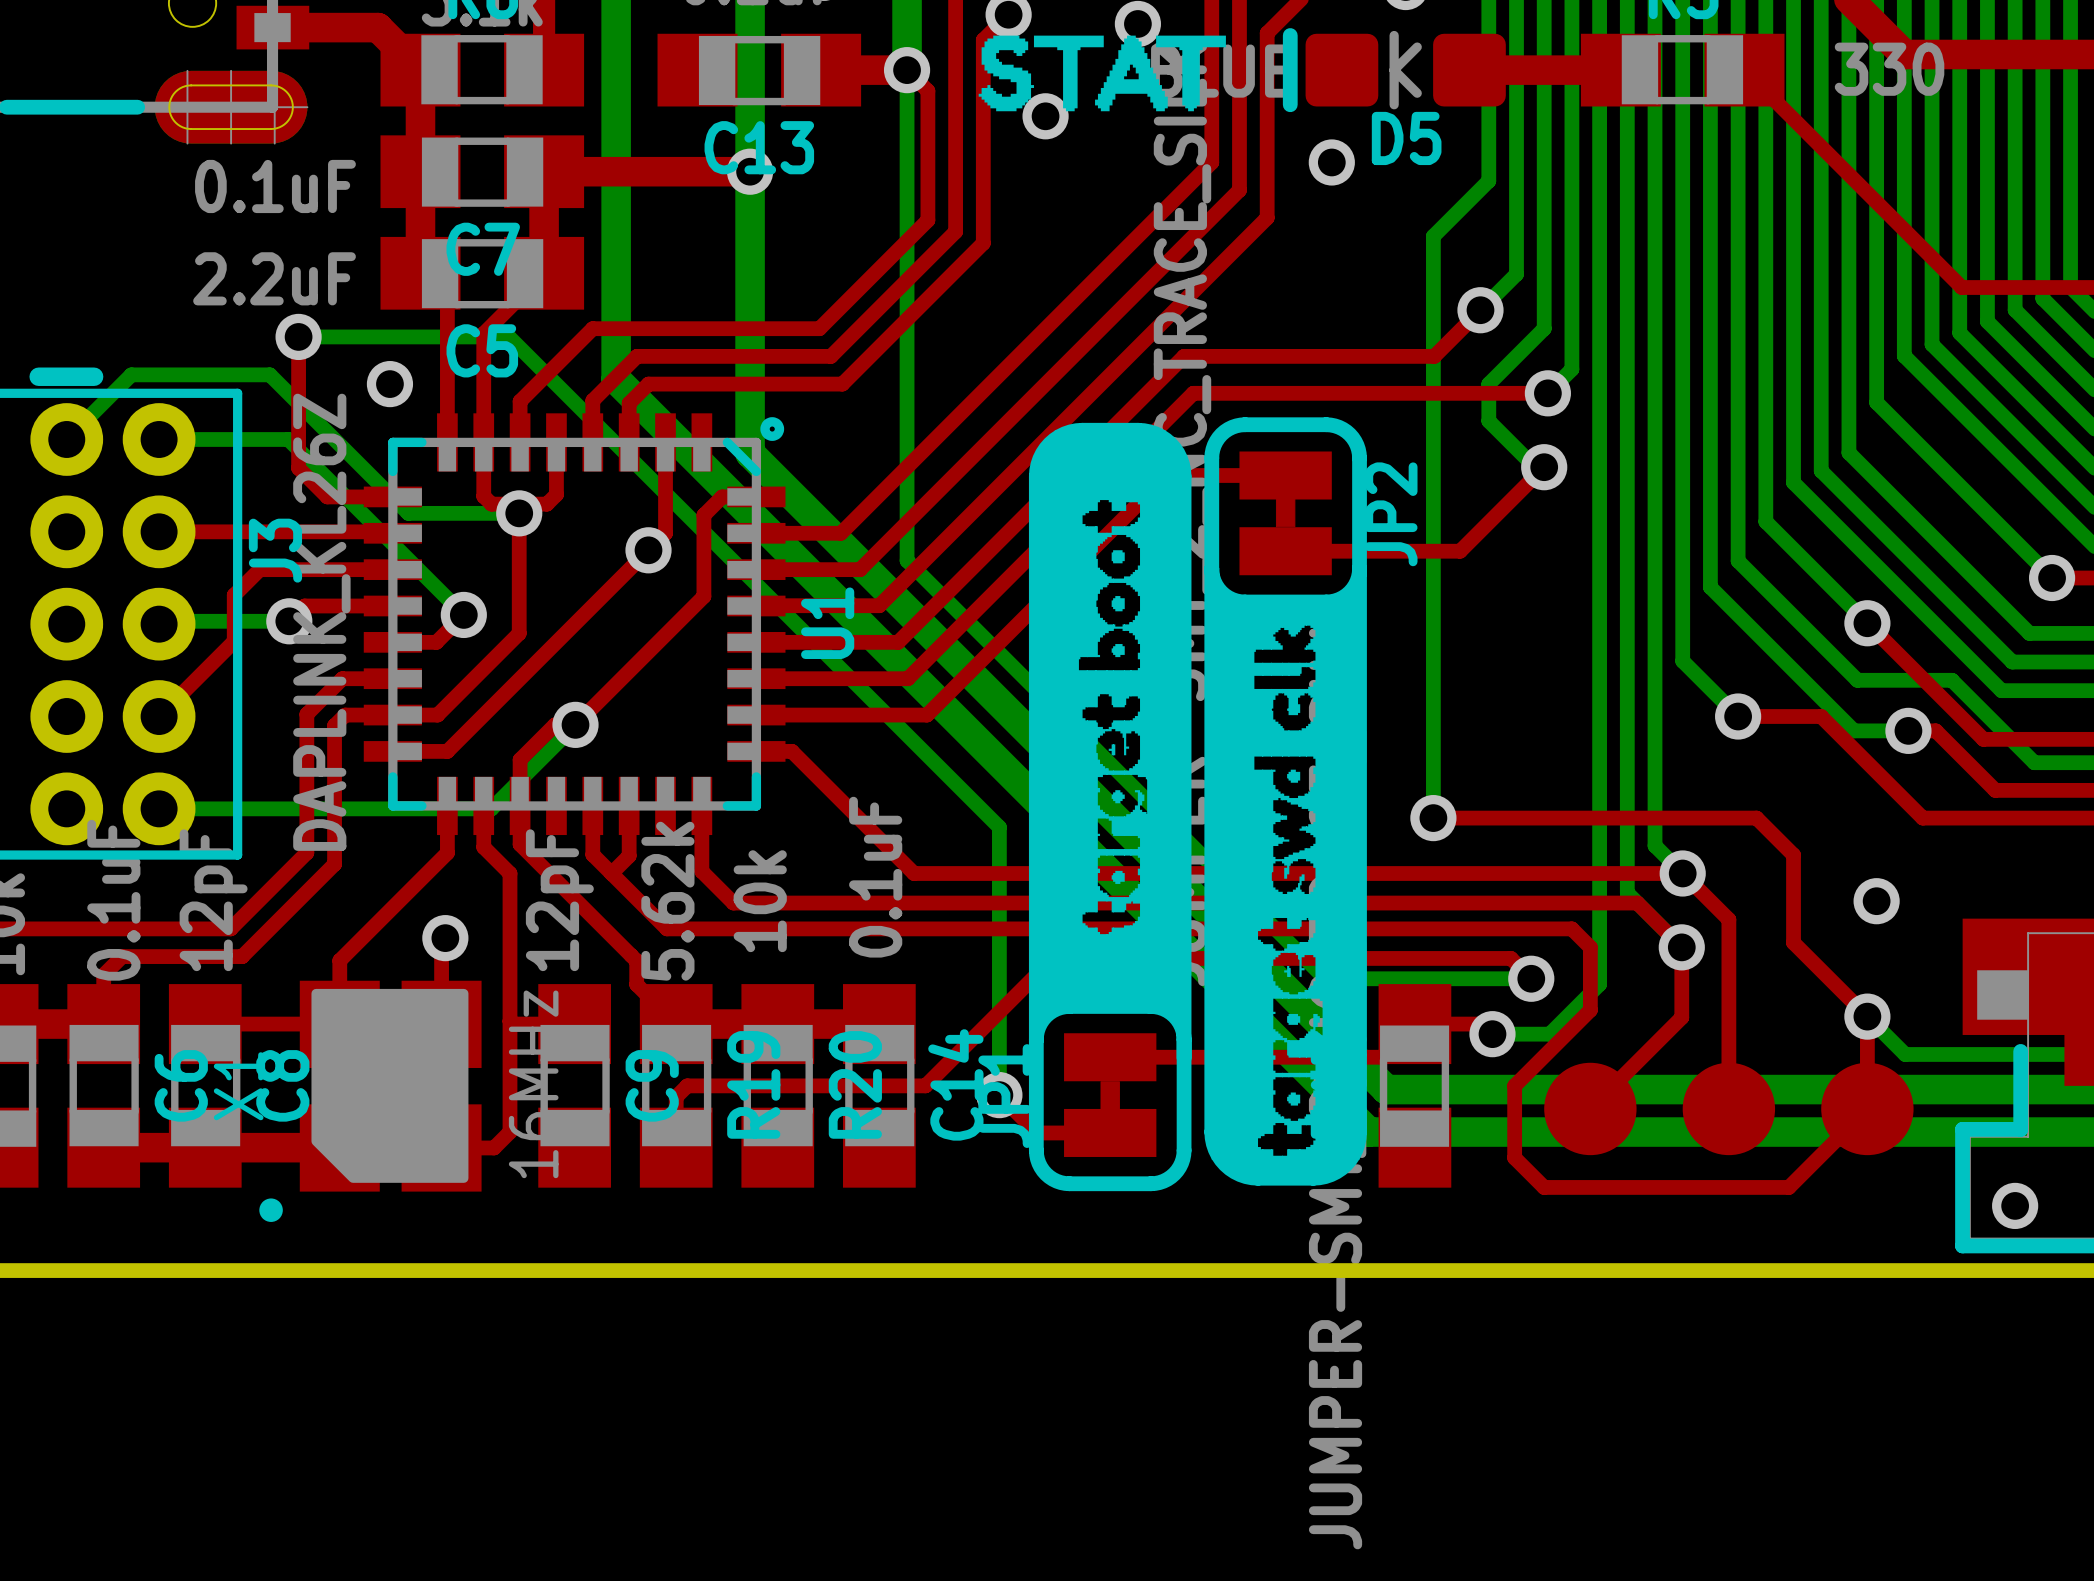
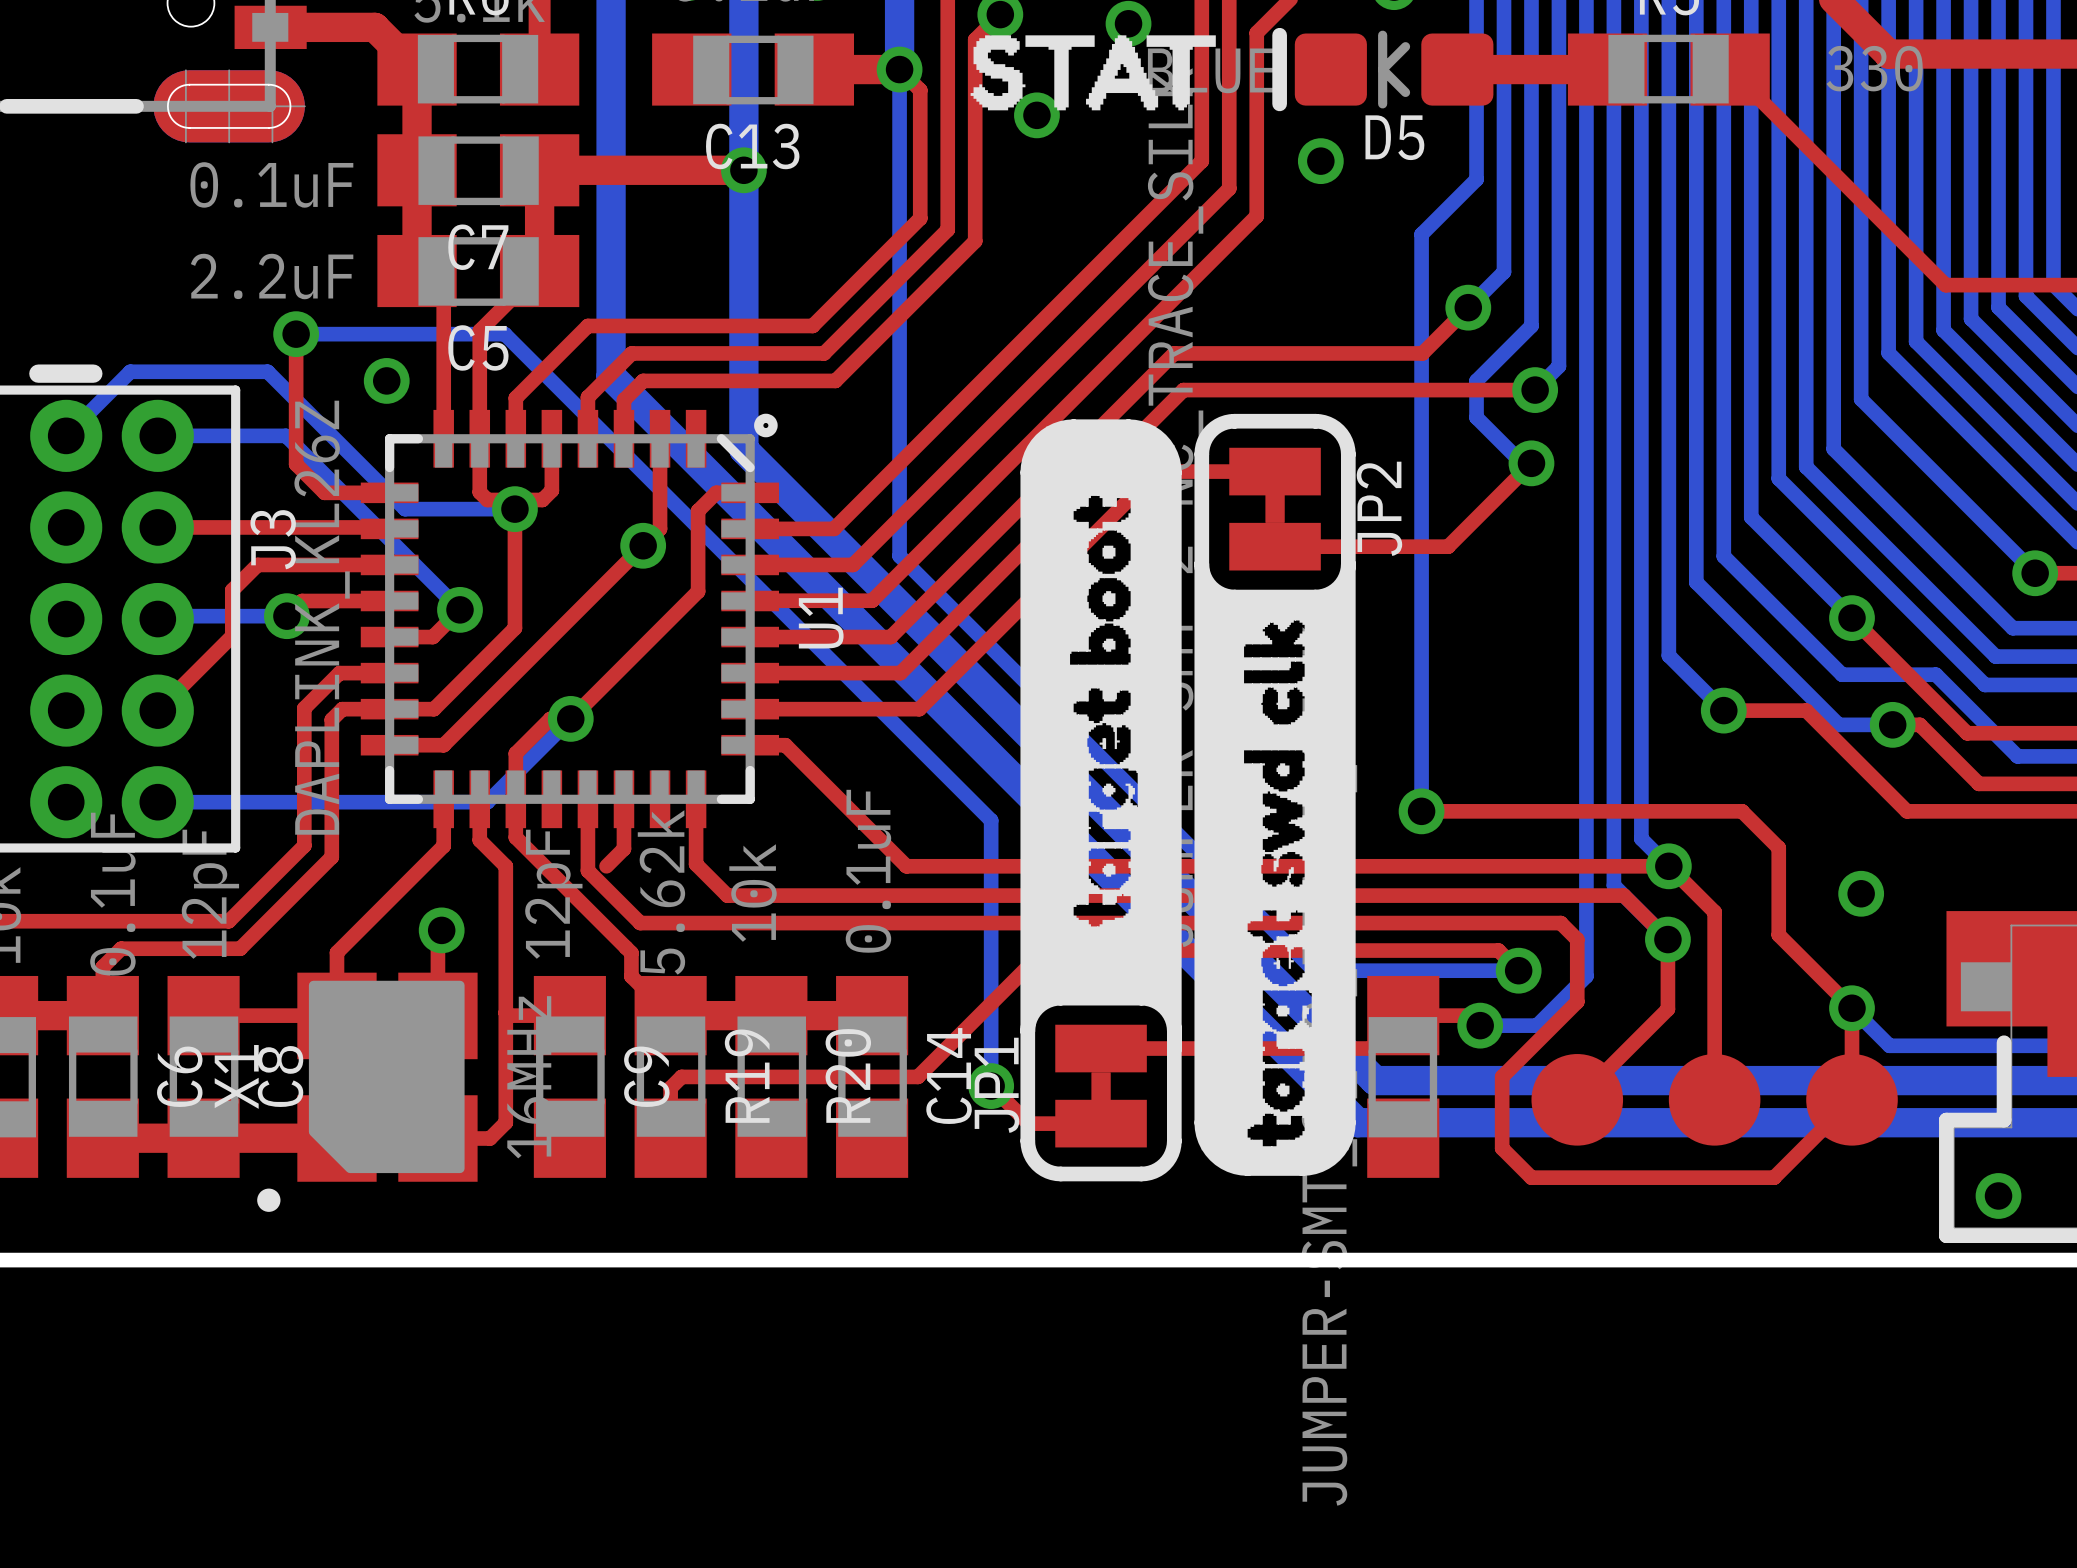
top track: (592, 854) (666, 928) (1571, 928) (1573, 930) -> (587, 847) (587, 870) (640, 923) (1560, 923)

